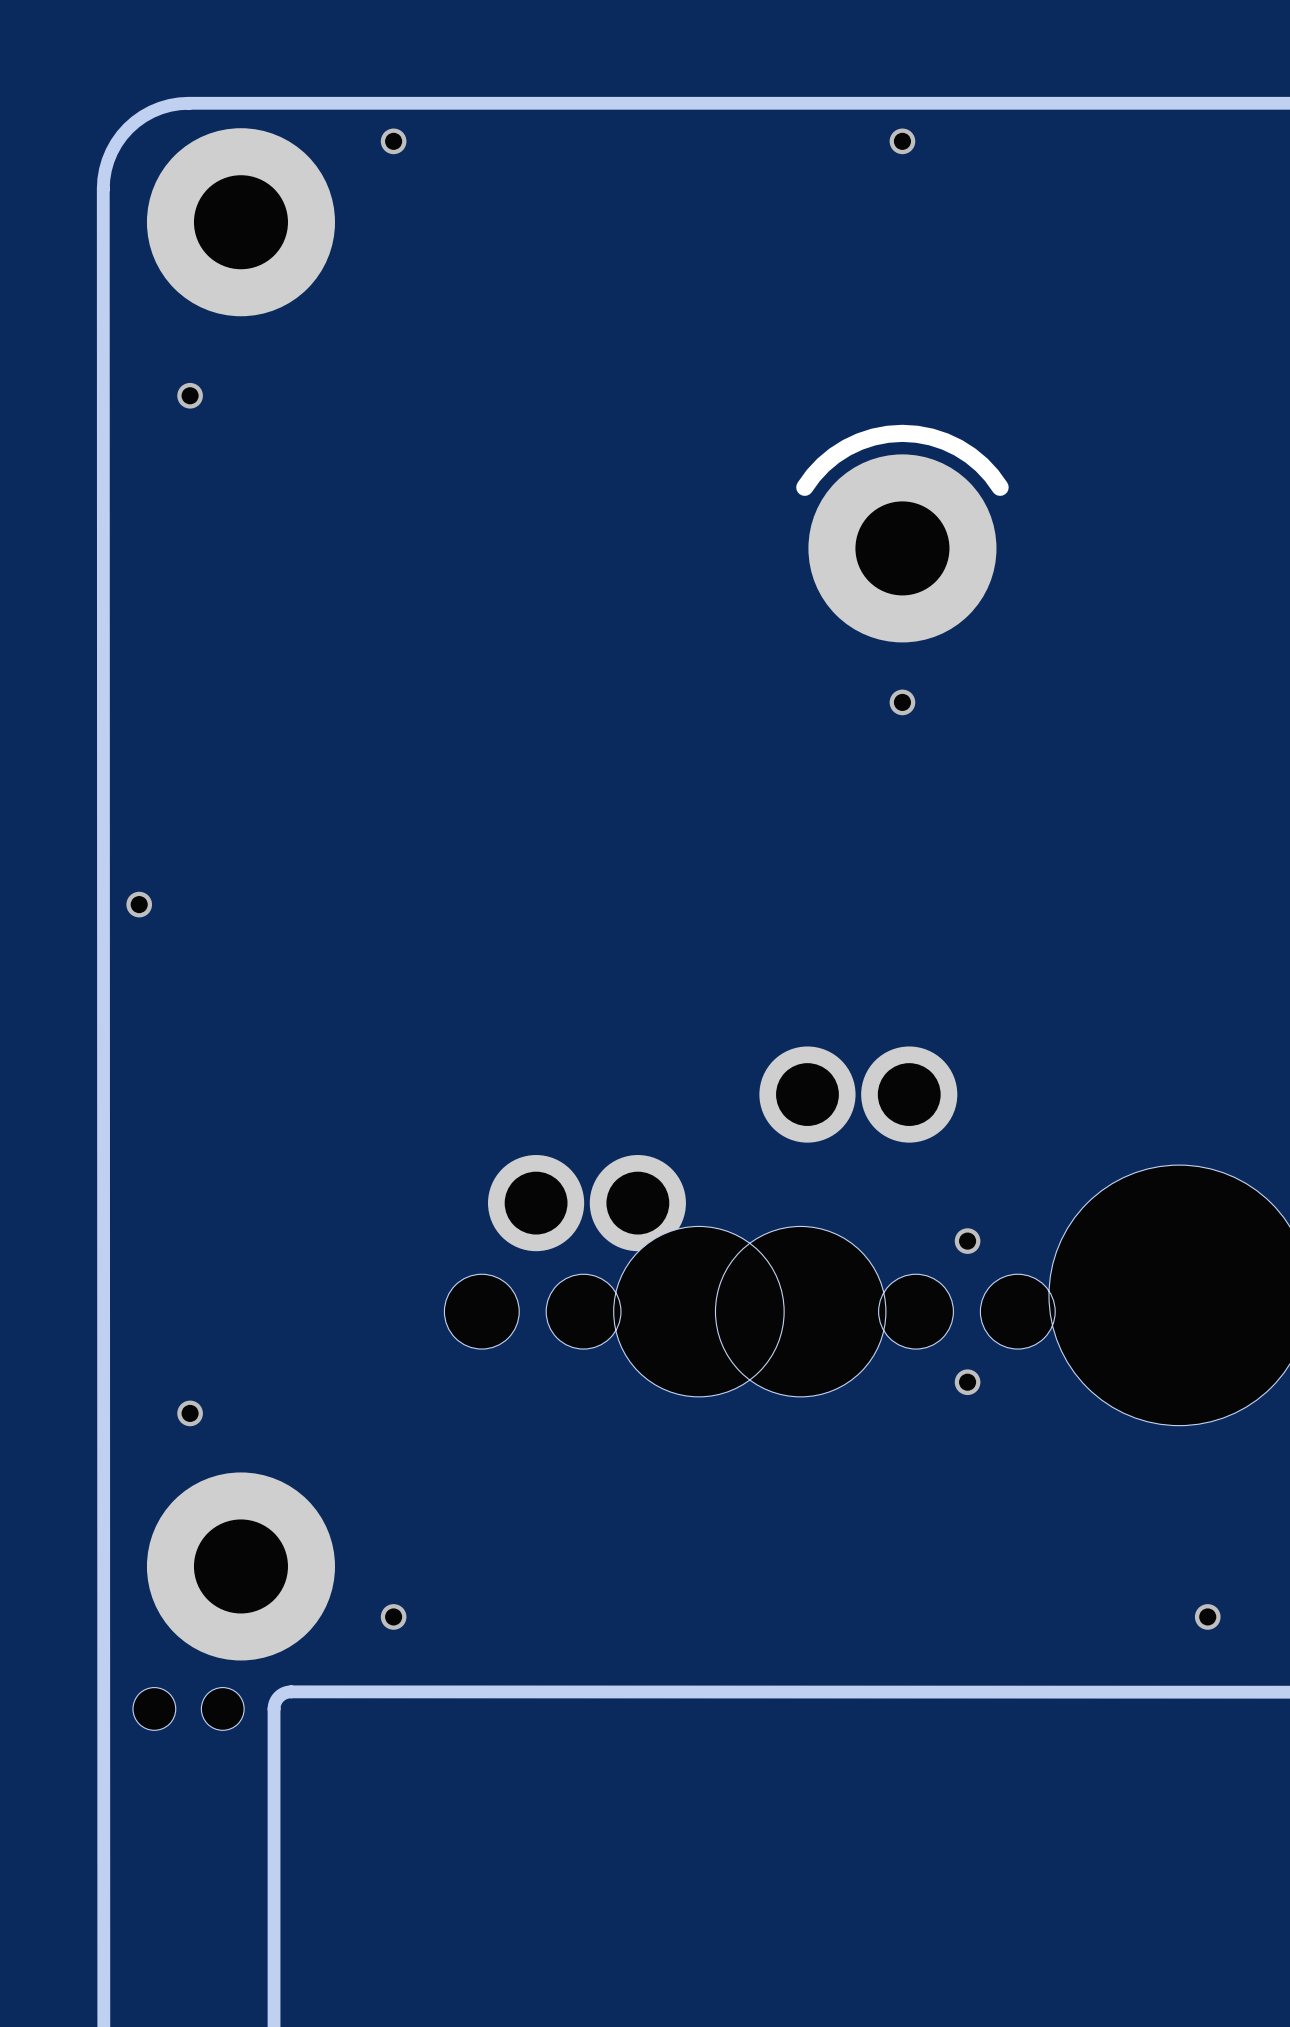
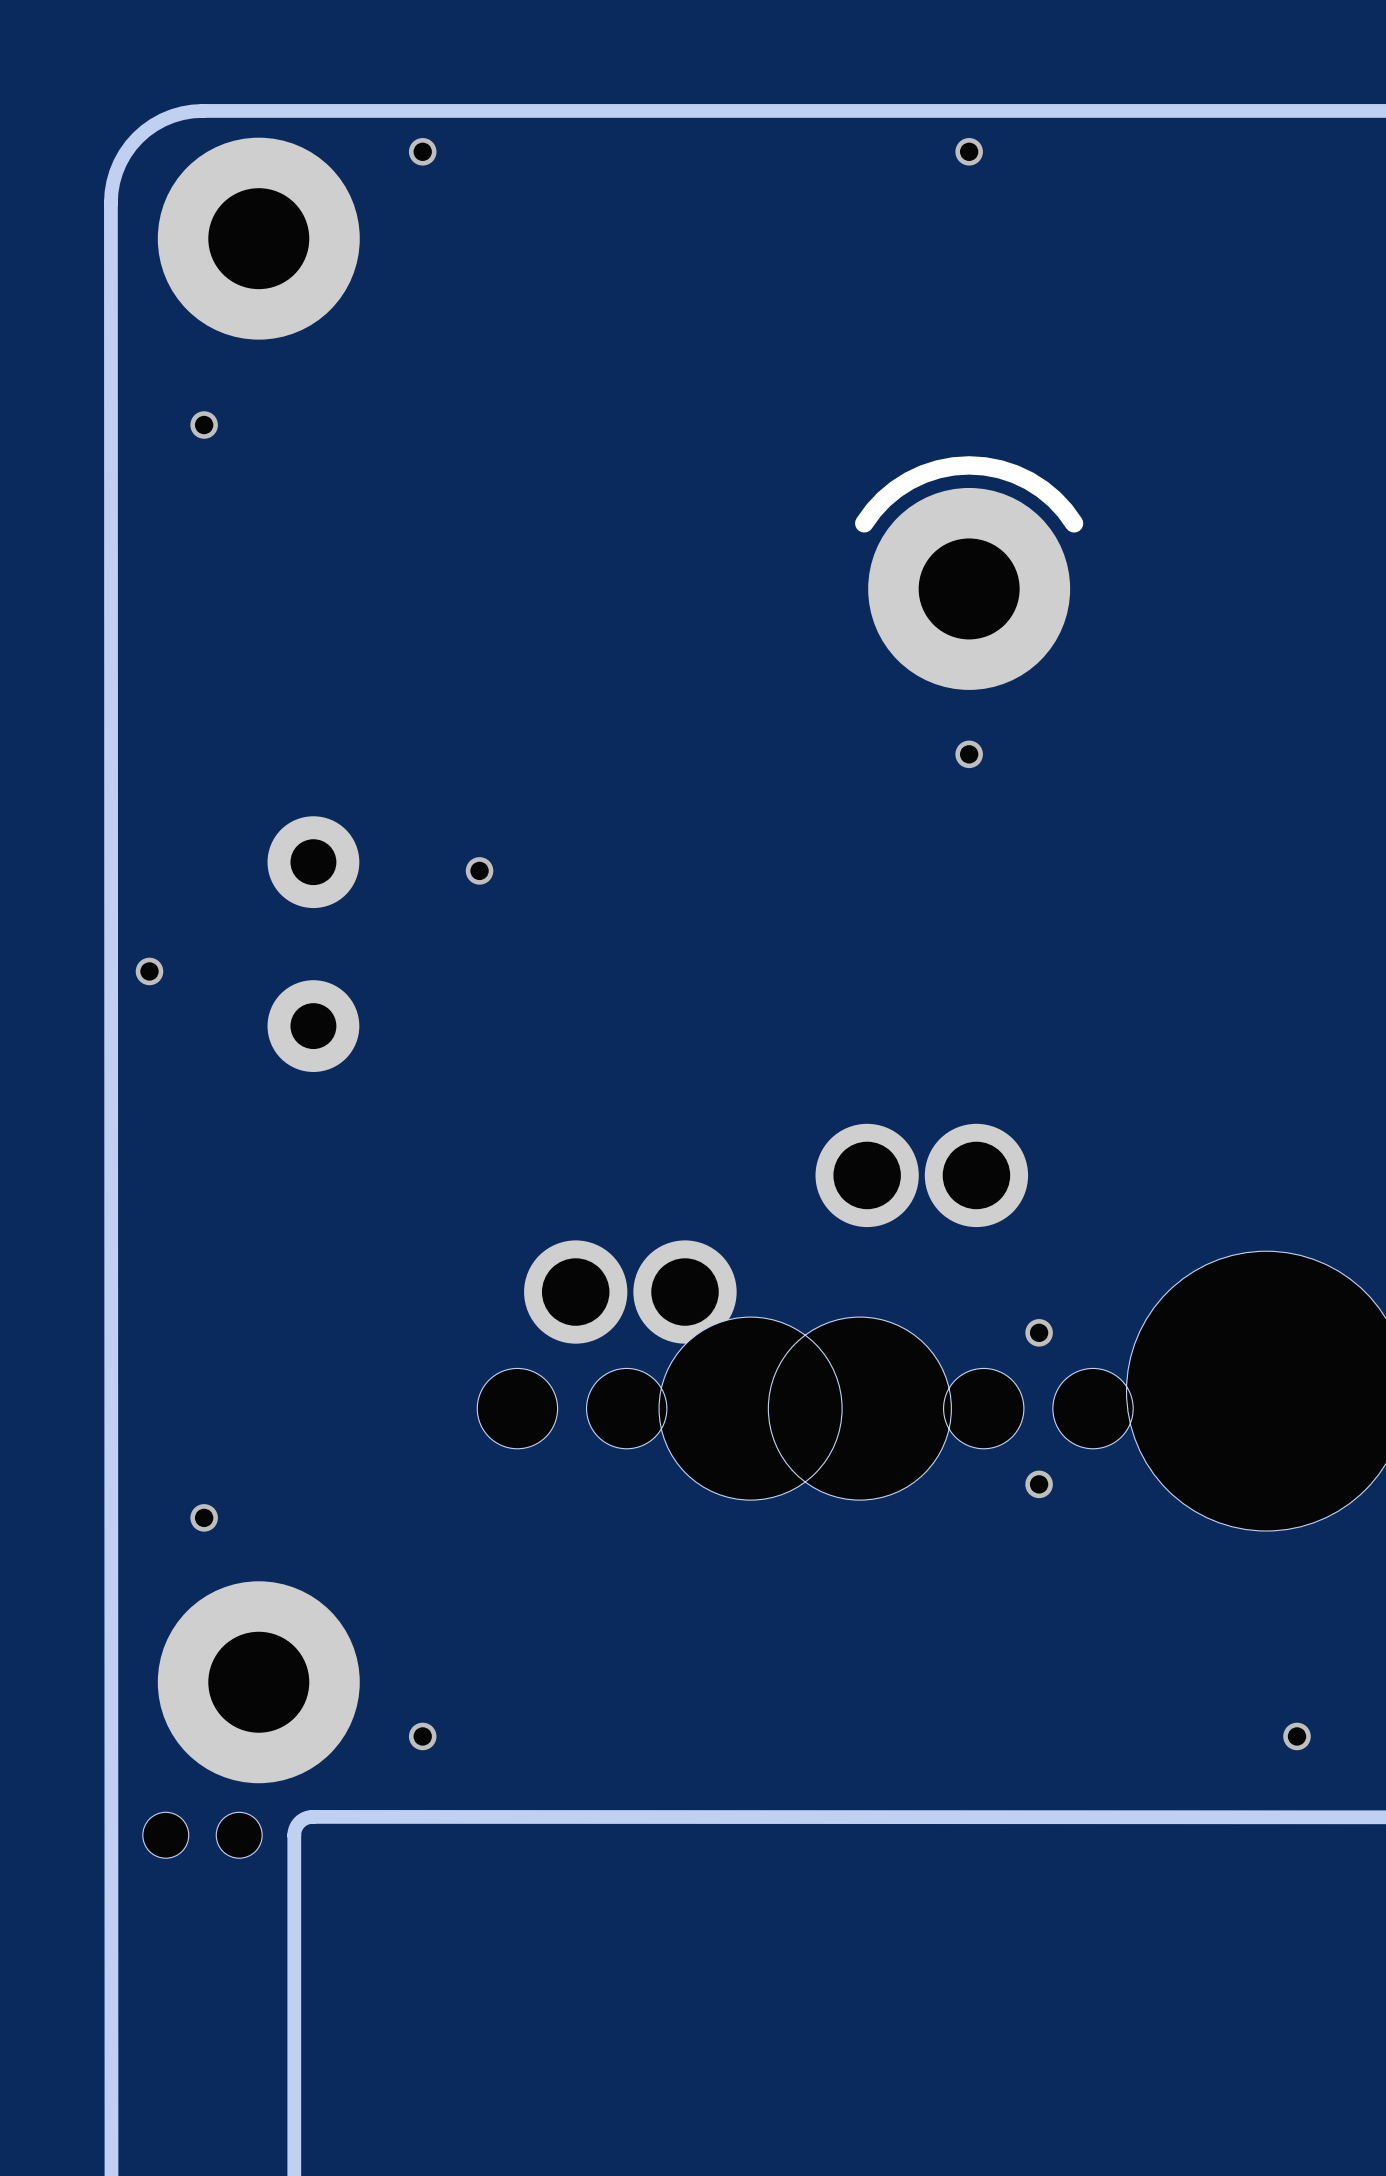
part: none -> (313, 862)
via: none -> (479, 870)
part: none -> (313, 1026)

